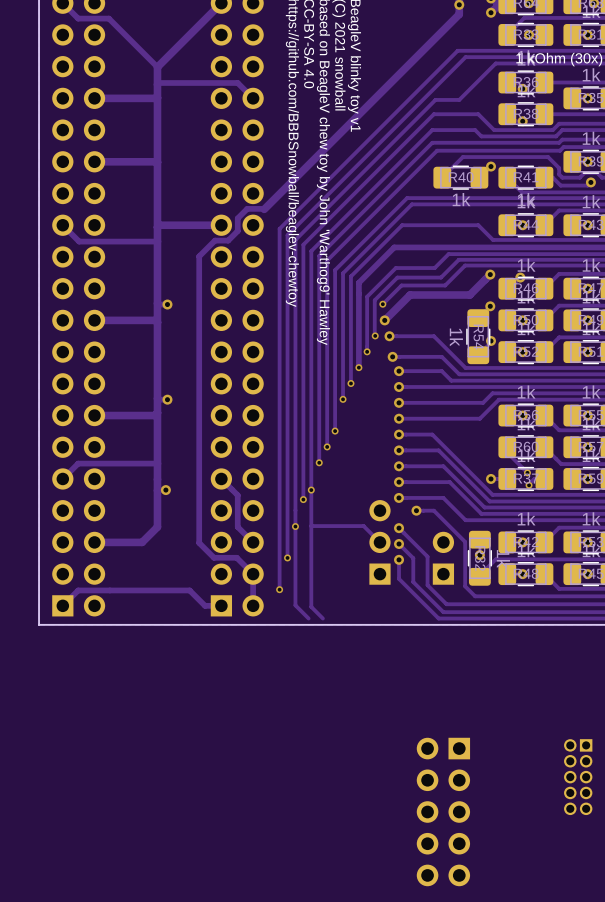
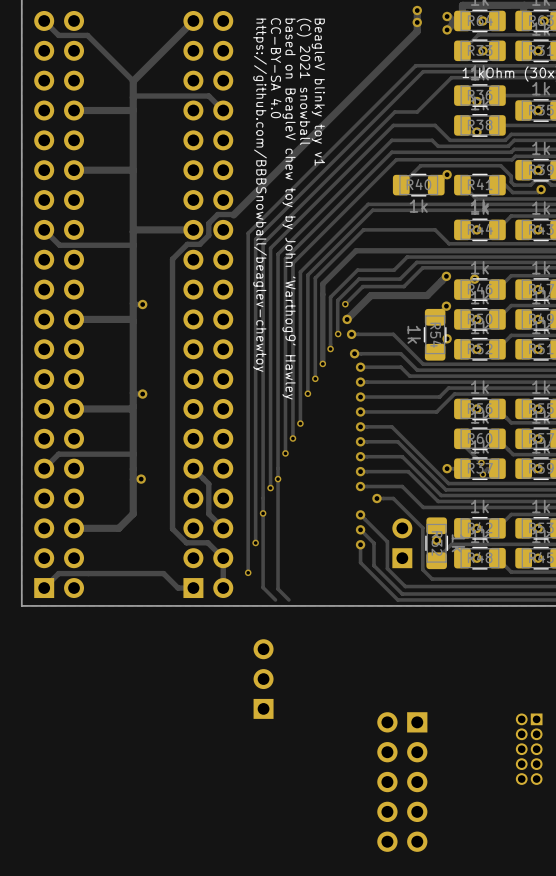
track: (311, 526) (363, 526) (379, 542) -> none
part position: (379, 542) -> (263, 679)

